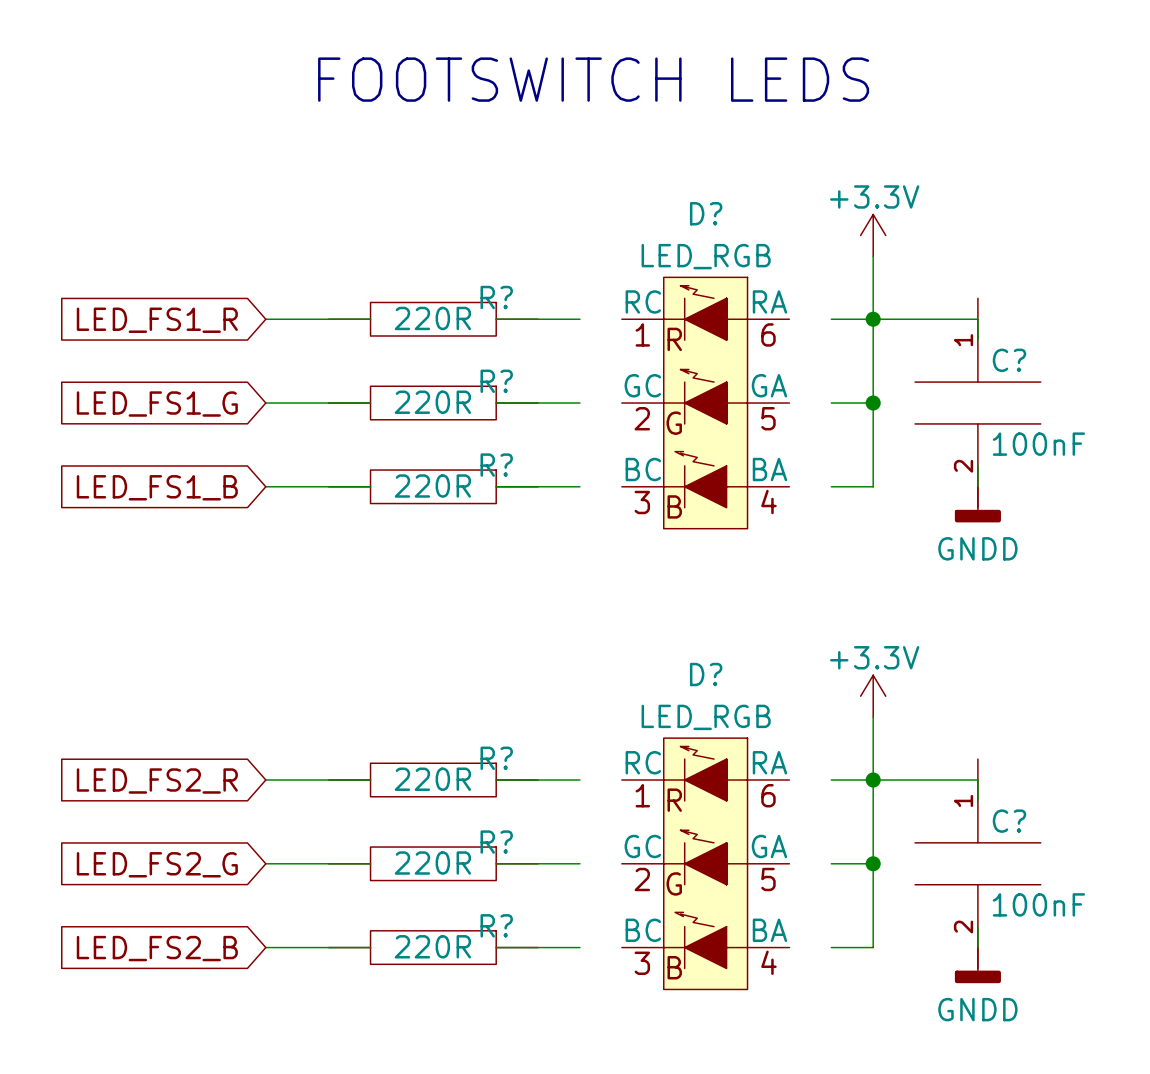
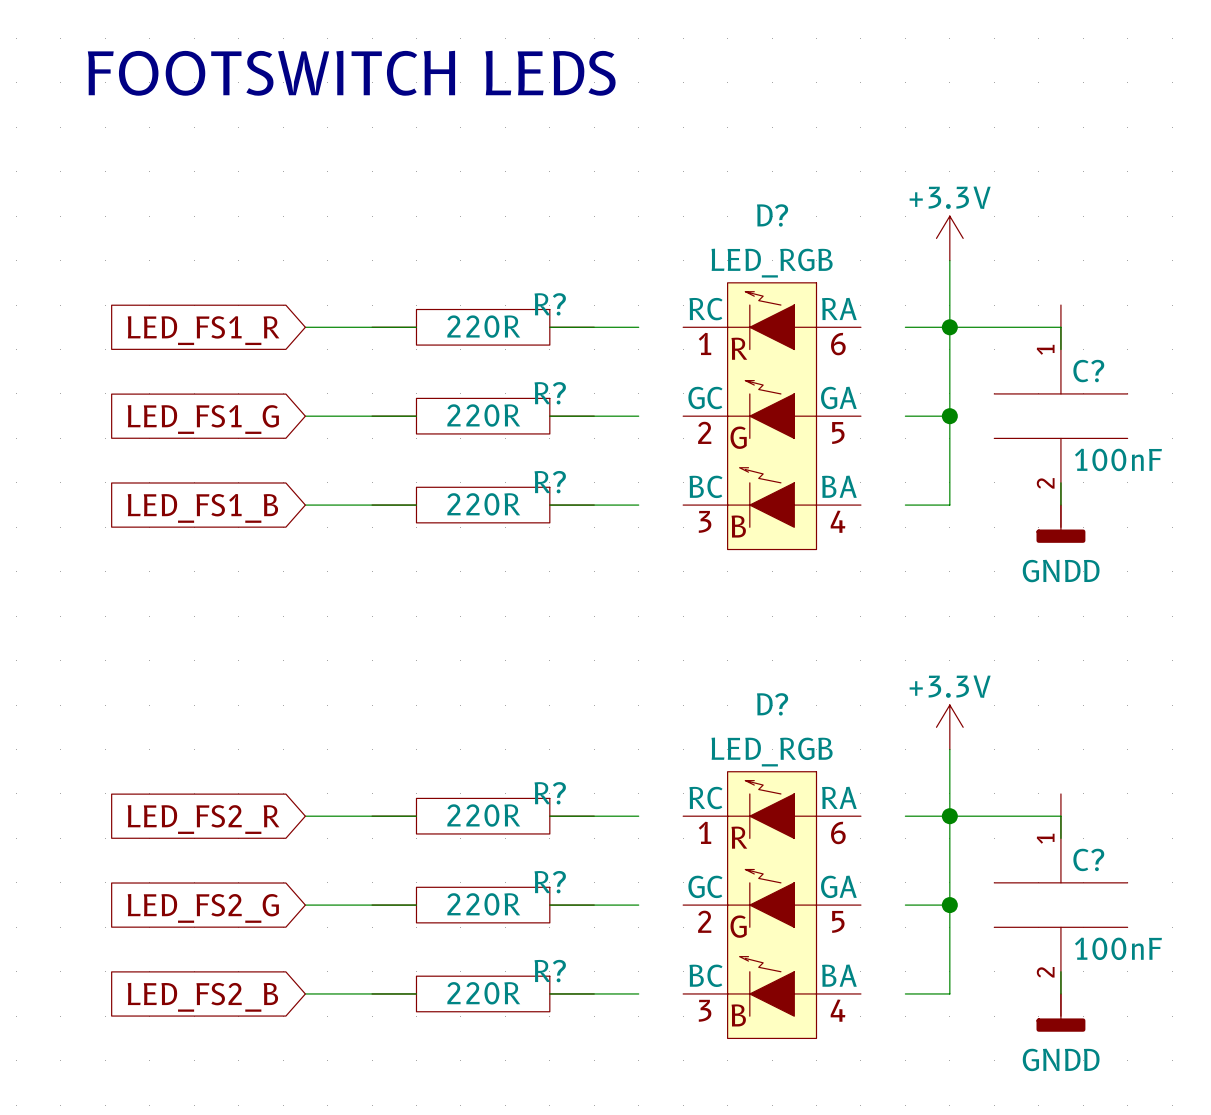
text position: FOOTSWITCH LEDS (593, 79) -> FOOTSWITCH LEDS (351, 73)

